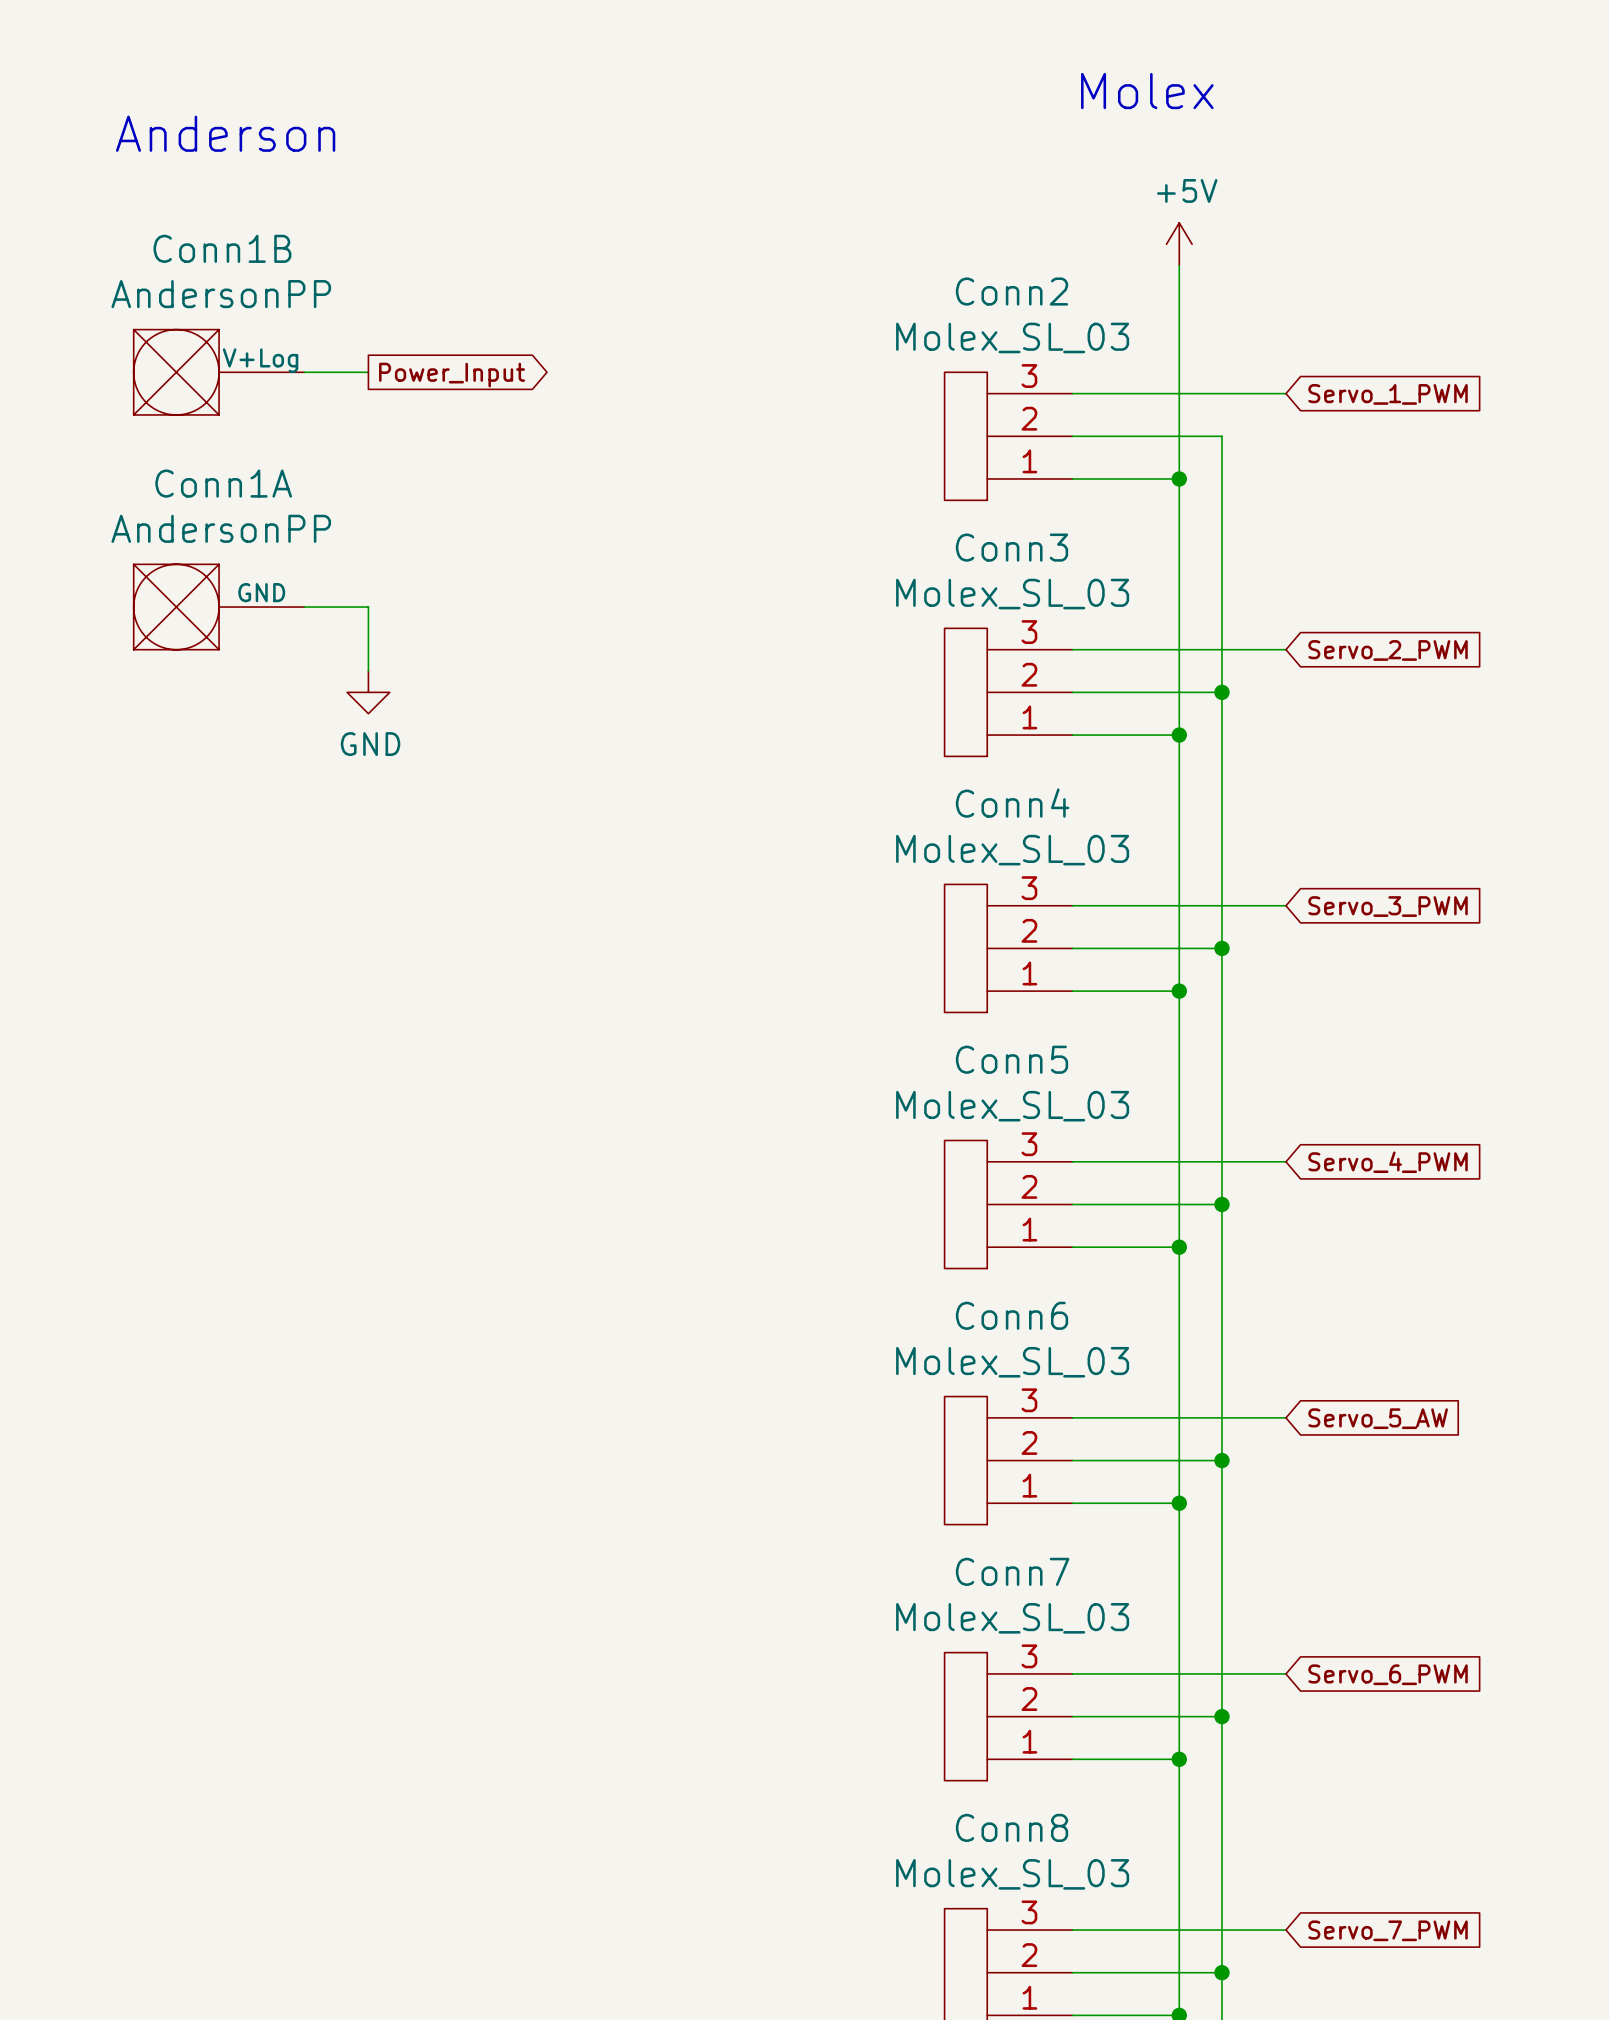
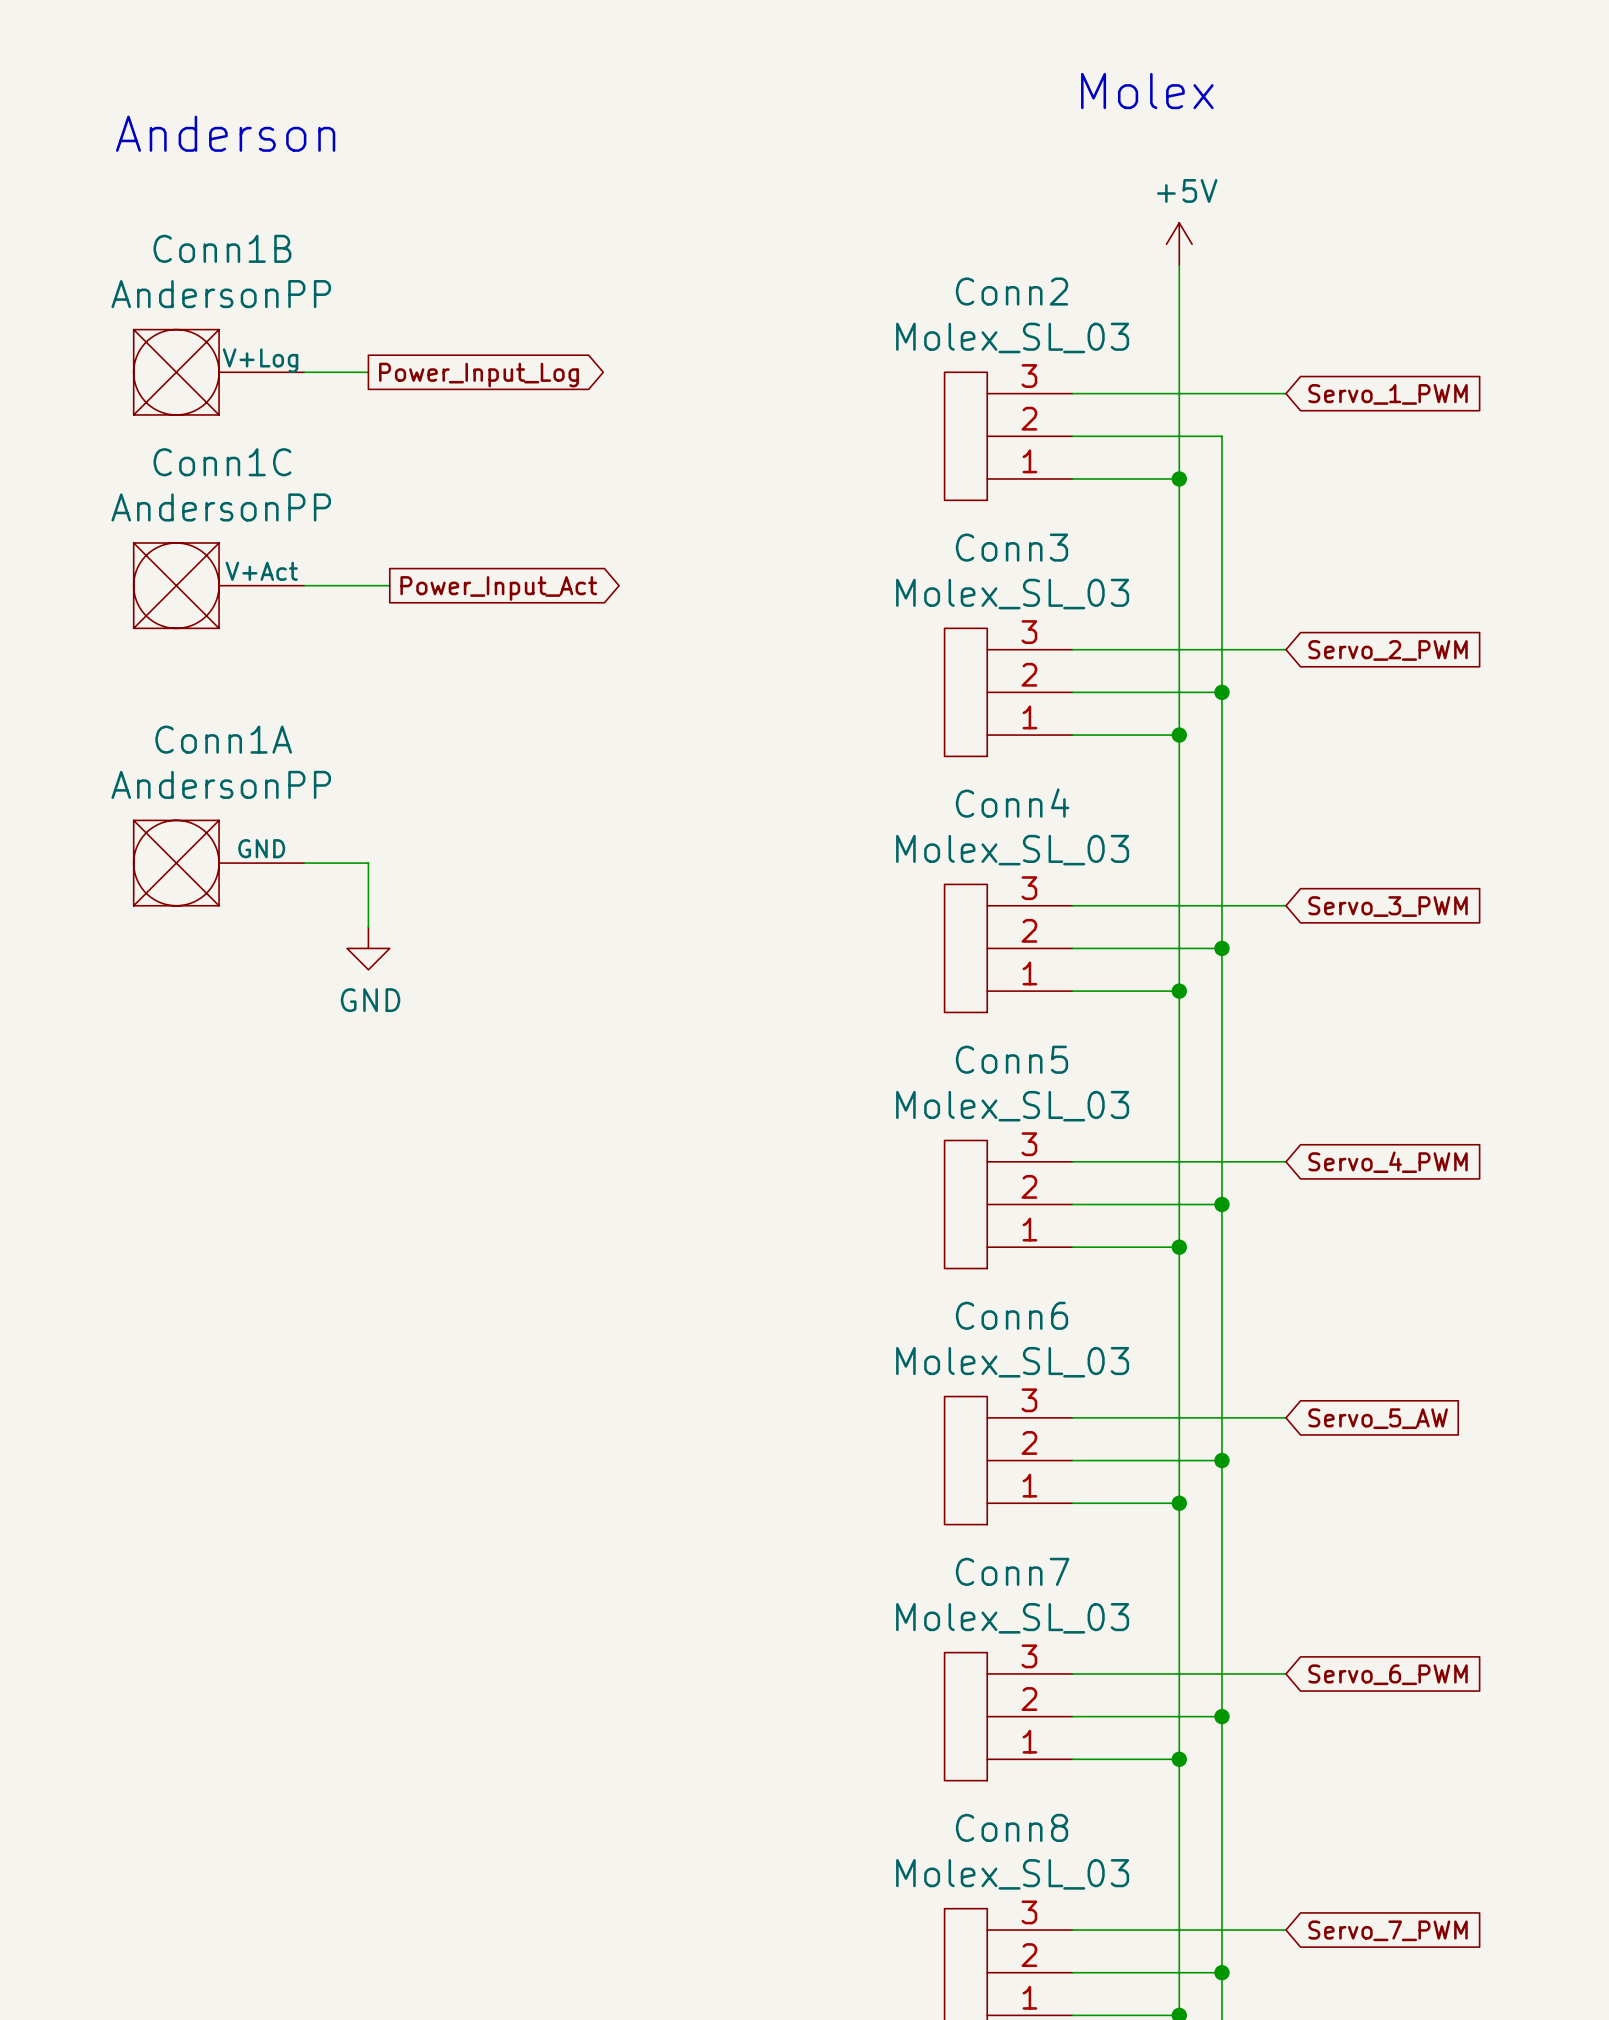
global label: Power_Input (452, 375) -> Power_Input_Log (478, 375)
Conn1C: none -> AndersonPP (219, 585)
wire: none -> (304, 585) (389, 585)
global label: none -> Power_Input_Act (498, 588)
Conn1A position: (219, 607) -> (219, 863)
wire: (304, 607) (368, 607) (368, 671) -> (304, 863) (368, 863) (368, 927)
power symbol position: GND (368, 692) -> GND (368, 948)

